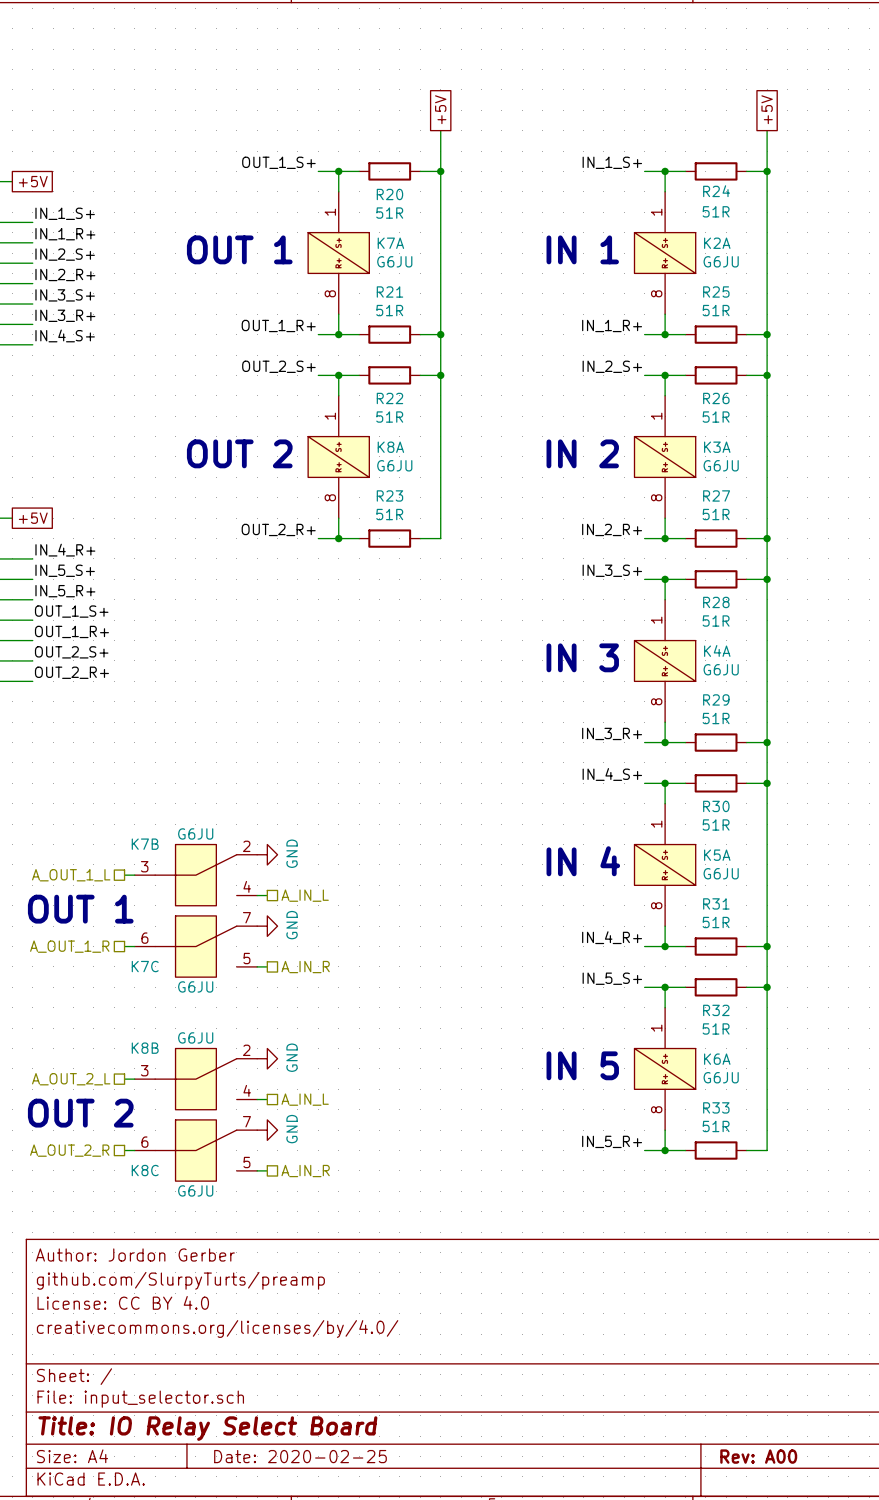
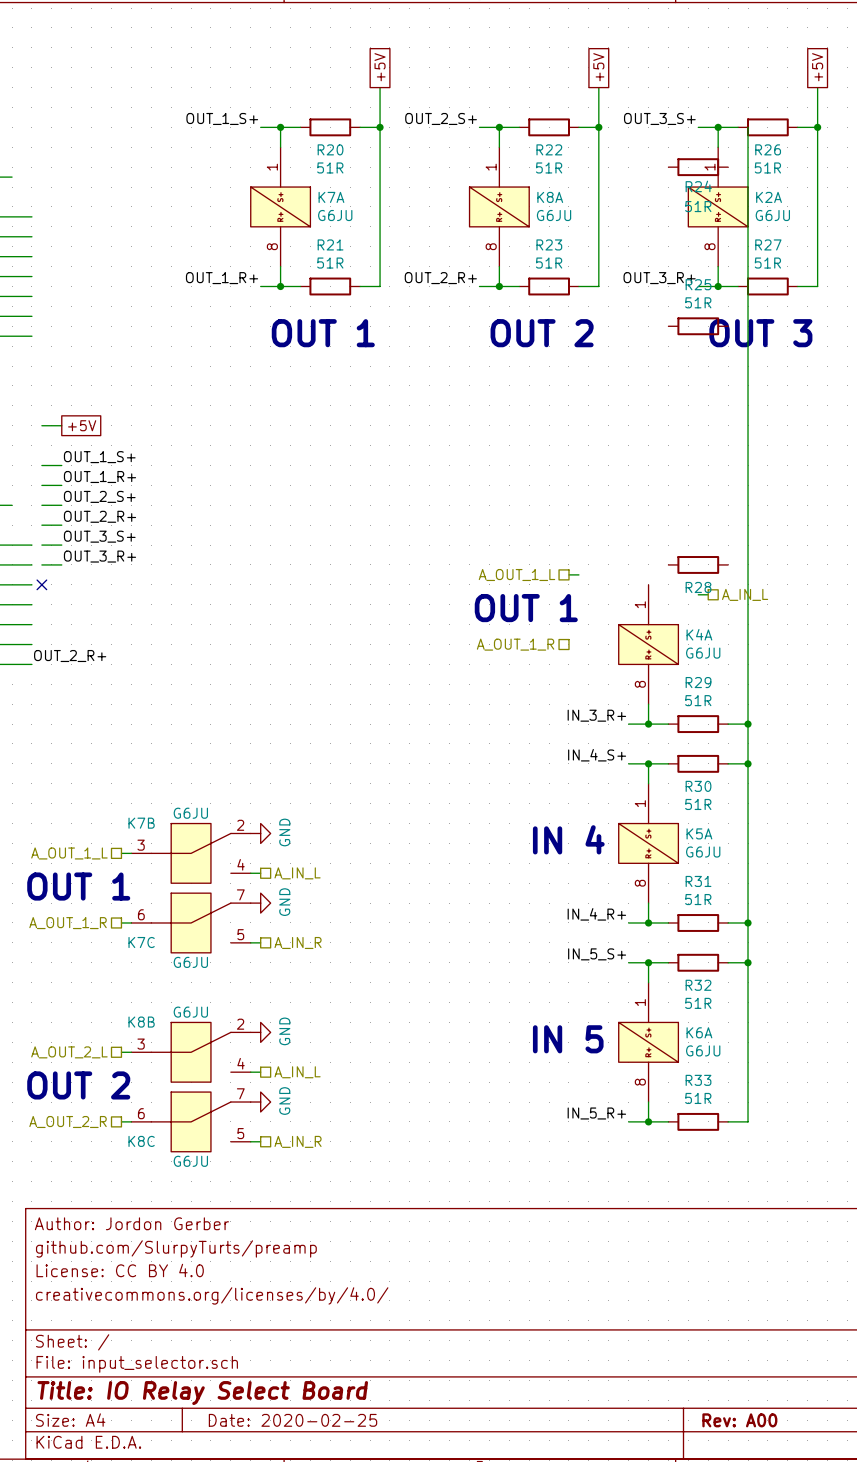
global label: none -> +5V (598, 67)
global label: none -> +5V (817, 67)
wire: none -> (380, 87) (380, 286) (360, 286)
wire: none -> (598, 87) (598, 286) (578, 286)
wire: none -> (817, 87) (817, 286) (797, 286)
global label position: +5V (440, 109) -> +5V (380, 67)
global label: +5V (767, 109) -> none
label: none -> OUT_2_S+ (441, 118)
label: none -> OUT_3_S+ (659, 118)
junction: none -> (280, 127)
junction: none -> (380, 127)
wire: (440, 130) (440, 538) (420, 538) -> none
wire: none -> (479, 127) (519, 127)
wire: none -> (499, 127) (499, 147)
junction: none -> (499, 127)
wire: none -> (578, 127) (598, 127)
junction: none -> (598, 127)
junction: none -> (718, 127)
junction: none -> (817, 127)
label position: OUT_1_S+ (278, 162) -> OUT_1_S+ (222, 118)
label: IN_1_S+ (612, 162) -> none
wire: (318, 171) (359, 171) -> (260, 127) (300, 127)
wire: (338, 171) (338, 191) -> (280, 127) (280, 147)
junction: (338, 171) -> none
R20 position: (389, 171) -> (330, 127)
wire: (420, 171) (440, 171) -> (360, 127) (380, 127)
junction: (440, 171) -> none
wire: (644, 171) (685, 171) -> (698, 127) (738, 127)
wire: (665, 171) (665, 191) -> (718, 127) (718, 147)
junction: (665, 171) -> none
wire: (746, 171) (767, 171) -> (797, 127) (817, 127)
junction: (767, 171) -> none
global label: +5V (33, 181) -> none
label: IN_1_S+ (65, 213) -> none
label: IN_1_R+ (65, 234) -> none
text position: OUT 1 (239, 249) -> OUT 1 (323, 333)
text: IN 1 (582, 249) -> none
K7A position: (338, 253) -> (280, 206)
K2A position: (665, 253) -> (718, 206)
label: IN_2_S+ (65, 254) -> none
label: IN_2_R+ (65, 274) -> none
label: none -> OUT_2_R+ (440, 278)
label: none -> OUT_3_R+ (659, 278)
junction: none -> (280, 286)
junction: none -> (499, 286)
junction: none -> (718, 286)
label: IN_3_S+ (65, 295) -> none
wire: (338, 314) (338, 334) -> (280, 266) (280, 286)
wire: (665, 314) (665, 334) -> (718, 266) (718, 286)
label: IN_3_R+ (65, 315) -> none
label position: OUT_1_R+ (278, 325) -> OUT_1_R+ (222, 278)
label: IN_1_R+ (612, 325) -> none
wire: (318, 334) (359, 334) -> (260, 286) (300, 286)
junction: (338, 334) -> none
R21 position: (389, 334) -> (330, 286)
wire: (420, 334) (440, 334) -> none
junction: (440, 334) -> none
wire: (644, 334) (685, 334) -> (698, 286) (738, 286)
junction: (665, 334) -> none
wire: (746, 334) (767, 334) -> none
junction: (767, 334) -> none
label: IN_4_S+ (65, 335) -> none
text: none -> OUT 2 (542, 333)
text: none -> OUT 3 (760, 333)
label: OUT_2_S+ (278, 366) -> none
label: IN_2_S+ (612, 366) -> none
wire: (318, 375) (359, 375) -> none
wire: (338, 375) (338, 395) -> none
junction: (338, 375) -> none
R22 position: (389, 375) -> (549, 127)
wire: (420, 375) (440, 375) -> none
junction: (440, 375) -> none
wire: (644, 375) (685, 375) -> (479, 286) (519, 286)
wire: (665, 375) (665, 395) -> (499, 266) (499, 286)
junction: (665, 375) -> none
R26 position: (716, 375) -> (767, 127)
wire: (746, 375) (767, 375) -> none
junction: (767, 375) -> none
wire: none -> (41, 425) (61, 425)
text: OUT 2 (239, 453) -> none
text: IN 2 (582, 453) -> none
K8A position: (338, 456) -> (499, 206)
K3A: G6JU (665, 456) -> none
wire: none -> (41, 465) (61, 465)
wire: none -> (41, 485) (61, 485)
global label position: +5V (33, 518) -> +5V (82, 425)
wire: none -> (41, 505) (61, 505)
wire: (338, 518) (338, 538) -> none
wire: (665, 518) (665, 538) -> none
label: none -> OUT_2_R+ (99, 516)
label: OUT_2_R+ (278, 529) -> none
label: IN_2_R+ (612, 529) -> none
wire: none -> (41, 525) (61, 525)
wire: (318, 538) (359, 538) -> none
junction: (338, 538) -> none
R23 position: (389, 538) -> (549, 286)
wire: (644, 538) (685, 538) -> none
junction: (665, 538) -> none
R27 position: (716, 538) -> (767, 286)
wire: (746, 538) (767, 538) -> none
junction: (767, 538) -> none
label: IN_4_R+ (65, 550) -> none
label: none -> OUT_3_S+ (99, 536)
wire: none -> (41, 545) (61, 545)
label: IN_5_S+ (65, 570) -> none
label: none -> OUT_3_R+ (99, 556)
label: IN_3_S+ (612, 570) -> none
wire: none -> (41, 564) (61, 564)
wire: (644, 579) (685, 579) -> none
wire: (665, 579) (665, 599) -> none
junction: (665, 579) -> none
wire: (746, 579) (767, 579) -> none
junction: (767, 579) -> none
hierarchical label: none -> A_OUT_1_L (516, 575)
wire: none -> (568, 574) (578, 574)
label: IN_5_R+ (65, 591) -> none
no-connect mark: none -> (41, 584)
wire: none -> (698, 594) (708, 594)
hierarchical label: none -> A_IN_L (745, 594)
label position: OUT_1_S+ (71, 611) -> OUT_1_S+ (99, 457)
R28 value: 51R (716, 621) -> none
text: none -> OUT 1 (526, 608)
label position: OUT_1_R+ (71, 631) -> OUT_1_R+ (99, 477)
label position: OUT_2_S+ (71, 652) -> OUT_2_S+ (99, 496)
text: IN 3 (582, 657) -> none
hierarchical label: none -> A_OUT_1_R (515, 644)

